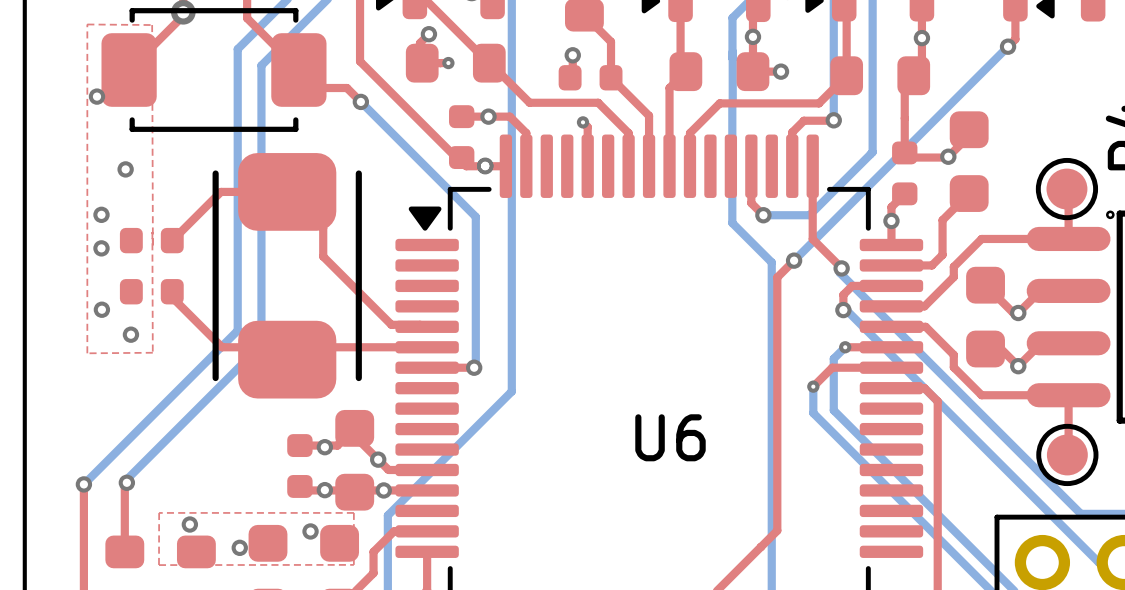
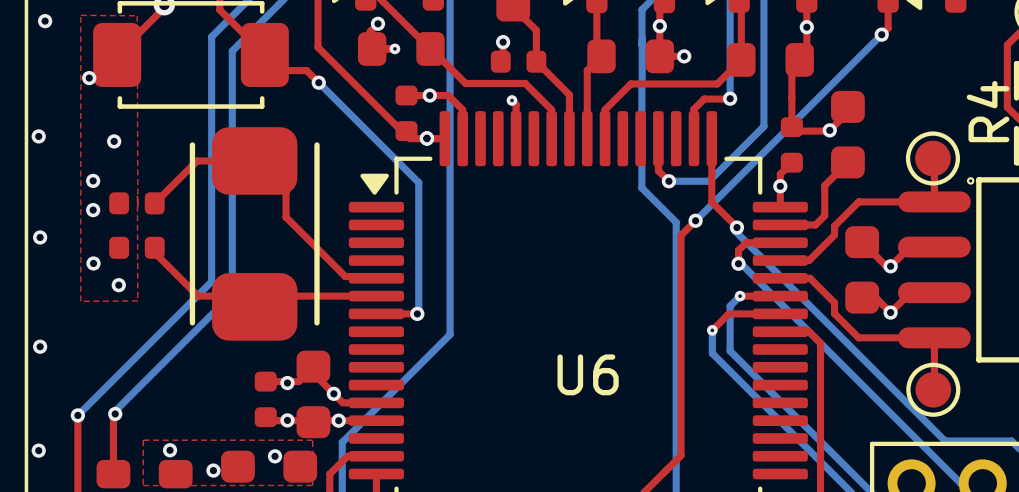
via: none -> (45, 21)
via: none -> (38, 136)
via: none -> (40, 237)
via: none -> (40, 346)
via: none -> (38, 450)

